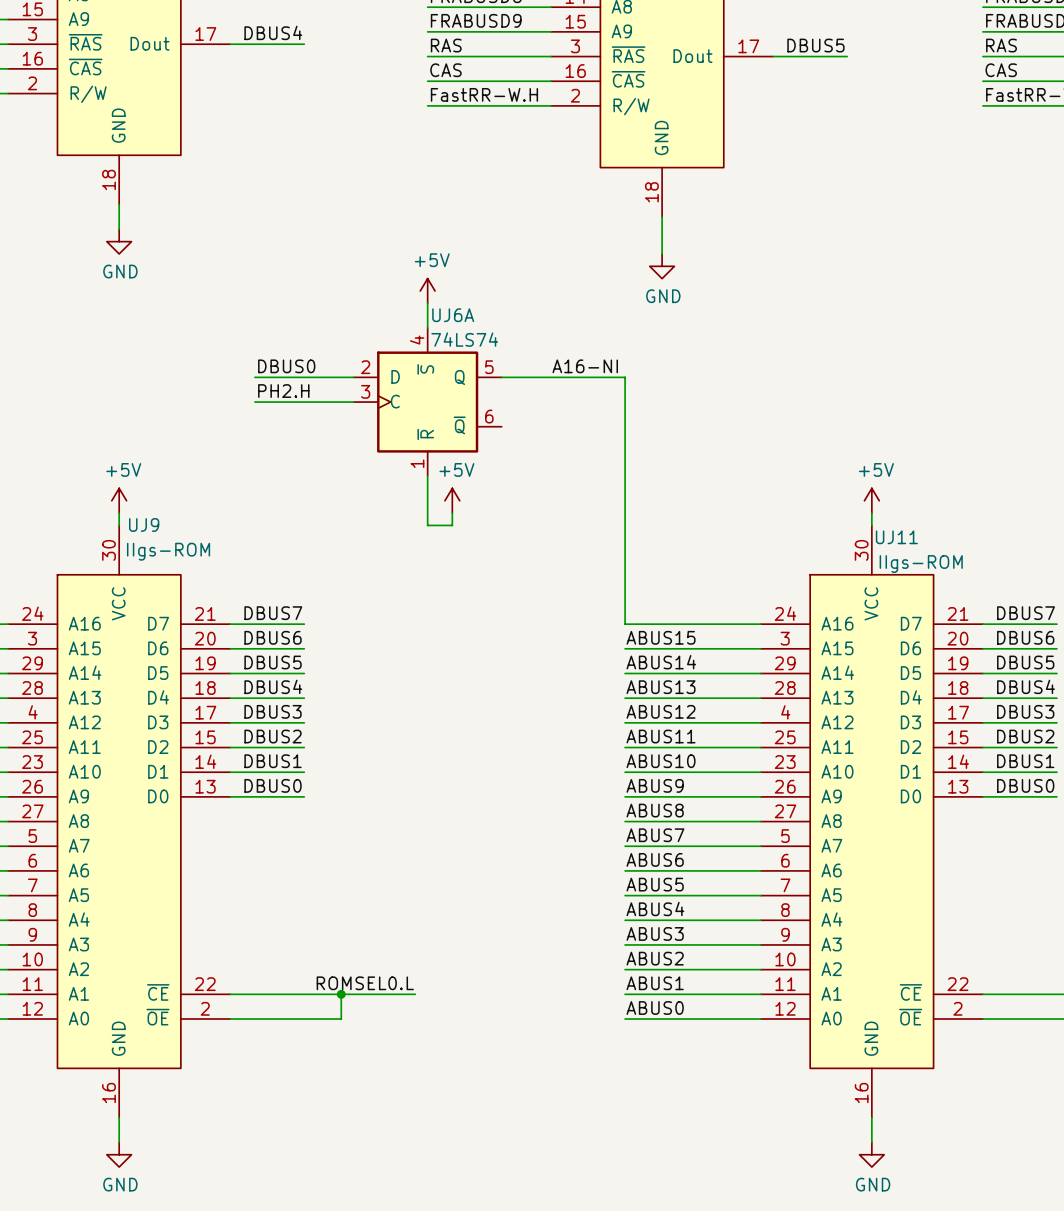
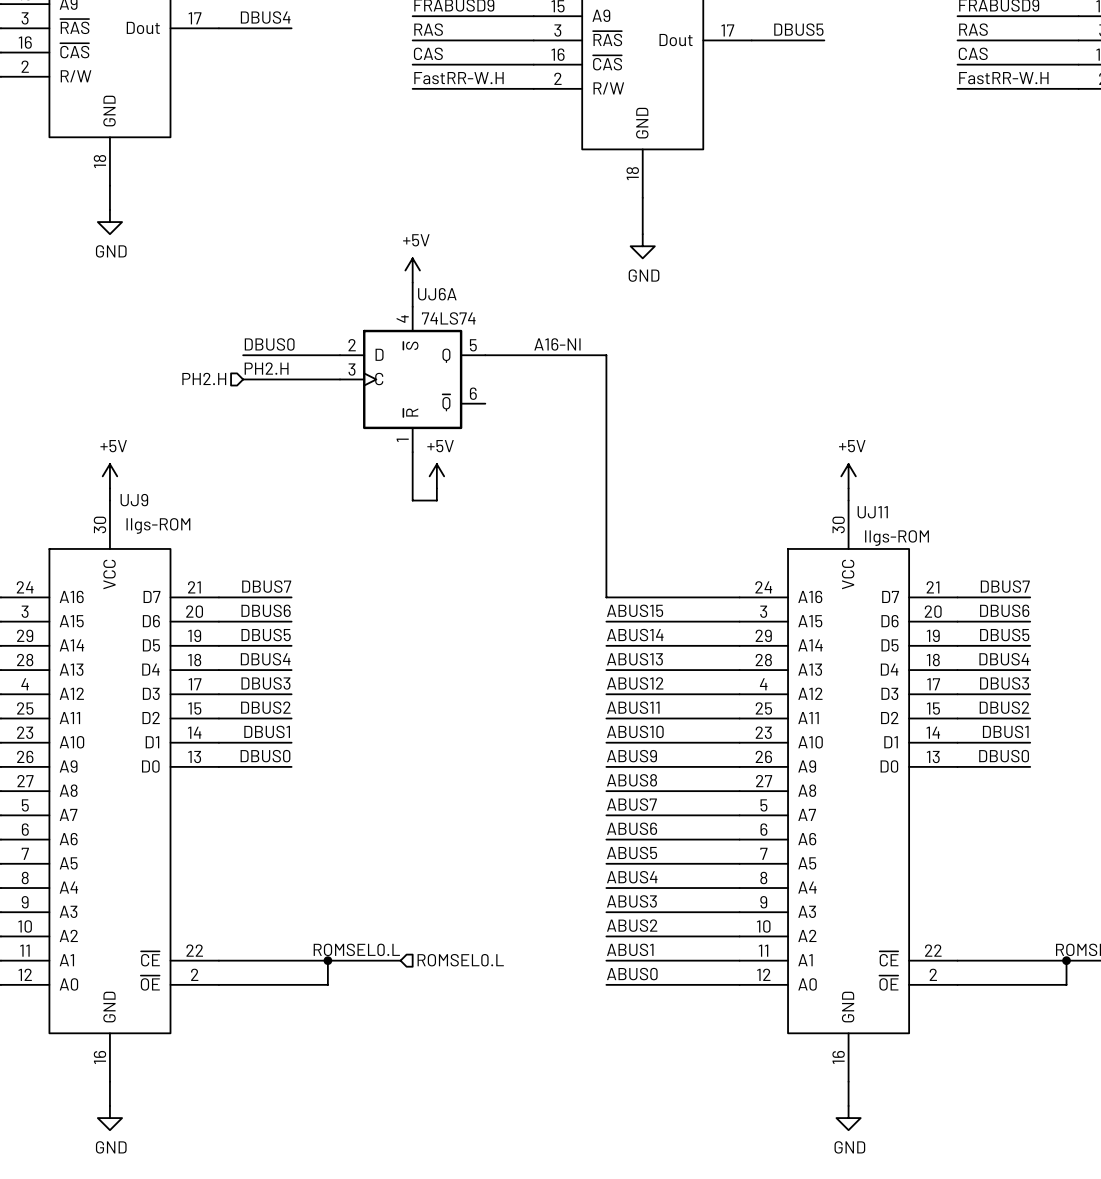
hierarchical label: none -> PH2.H (204, 378)
hierarchical label: none -> ROMSEL0.L (460, 960)

